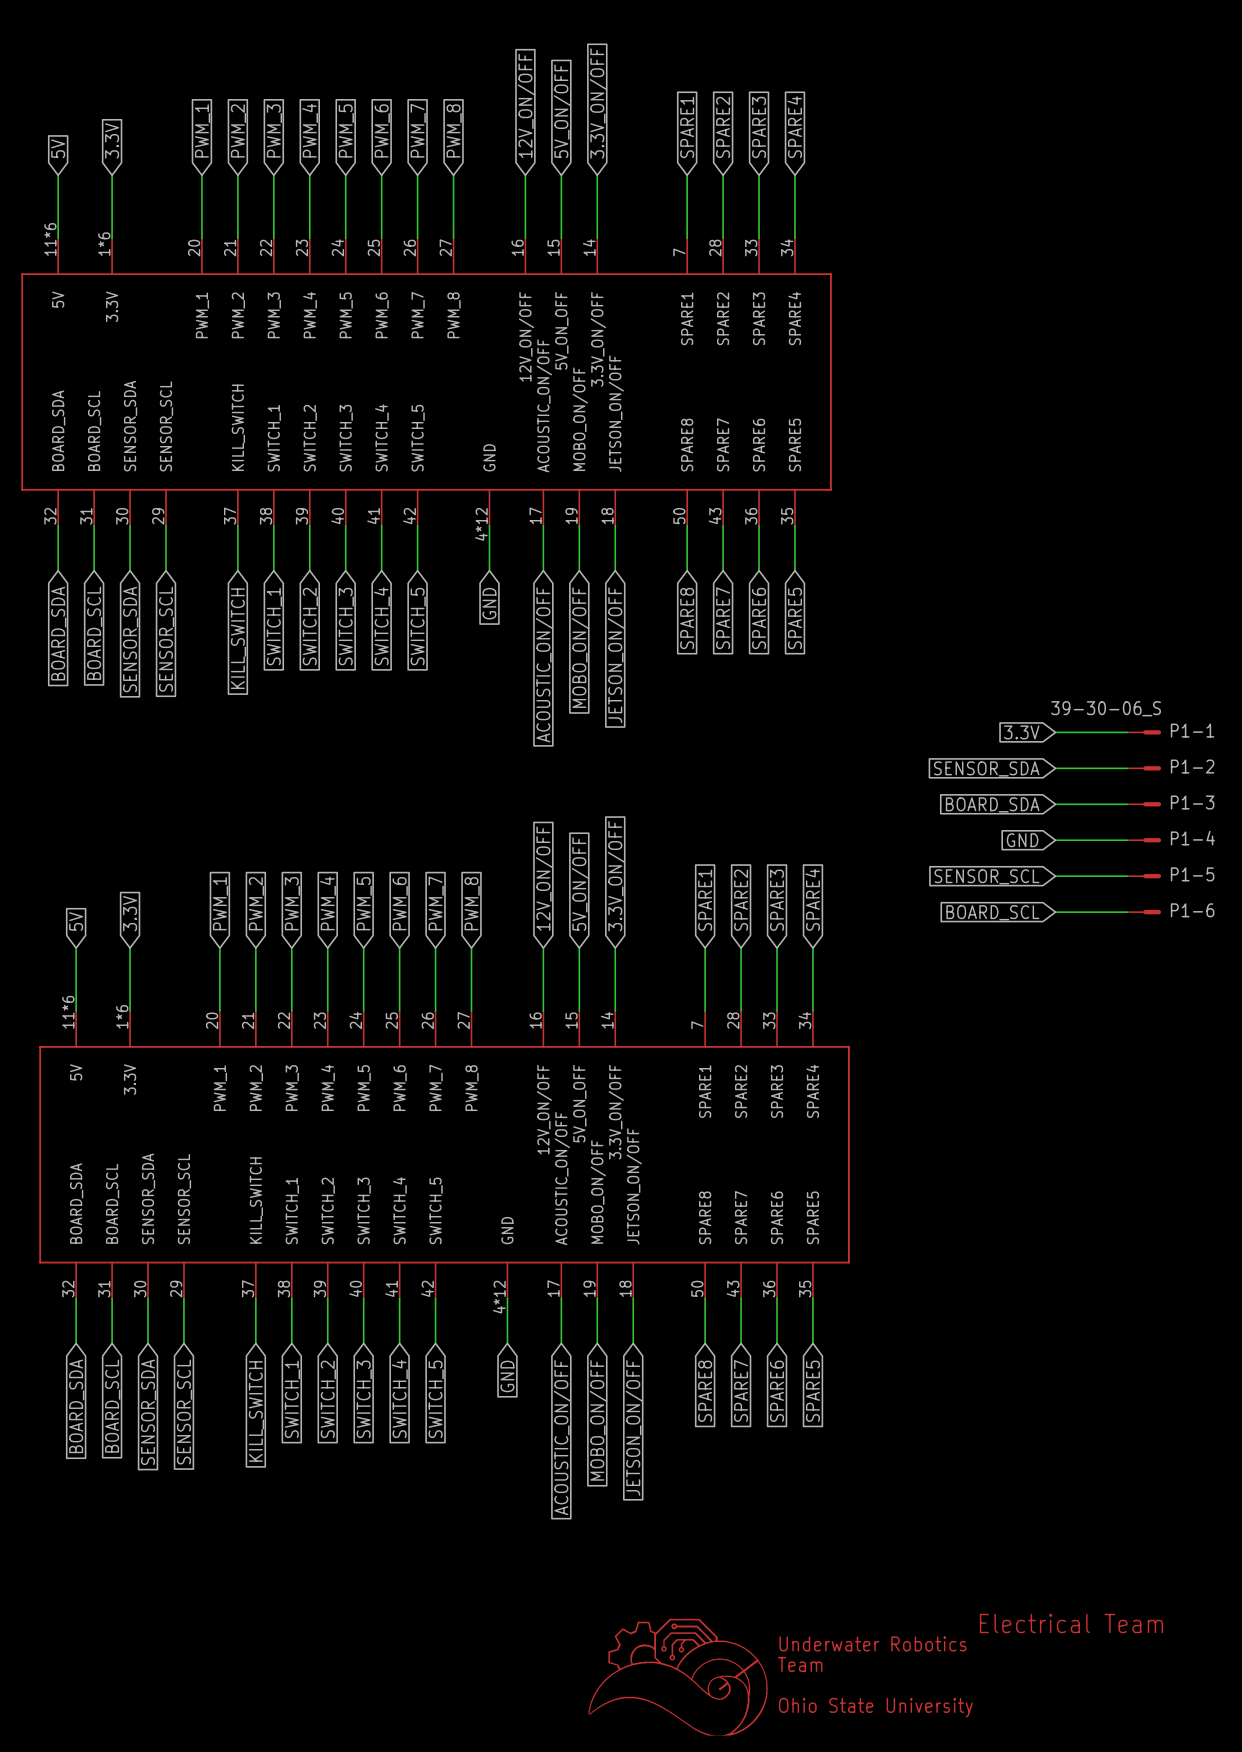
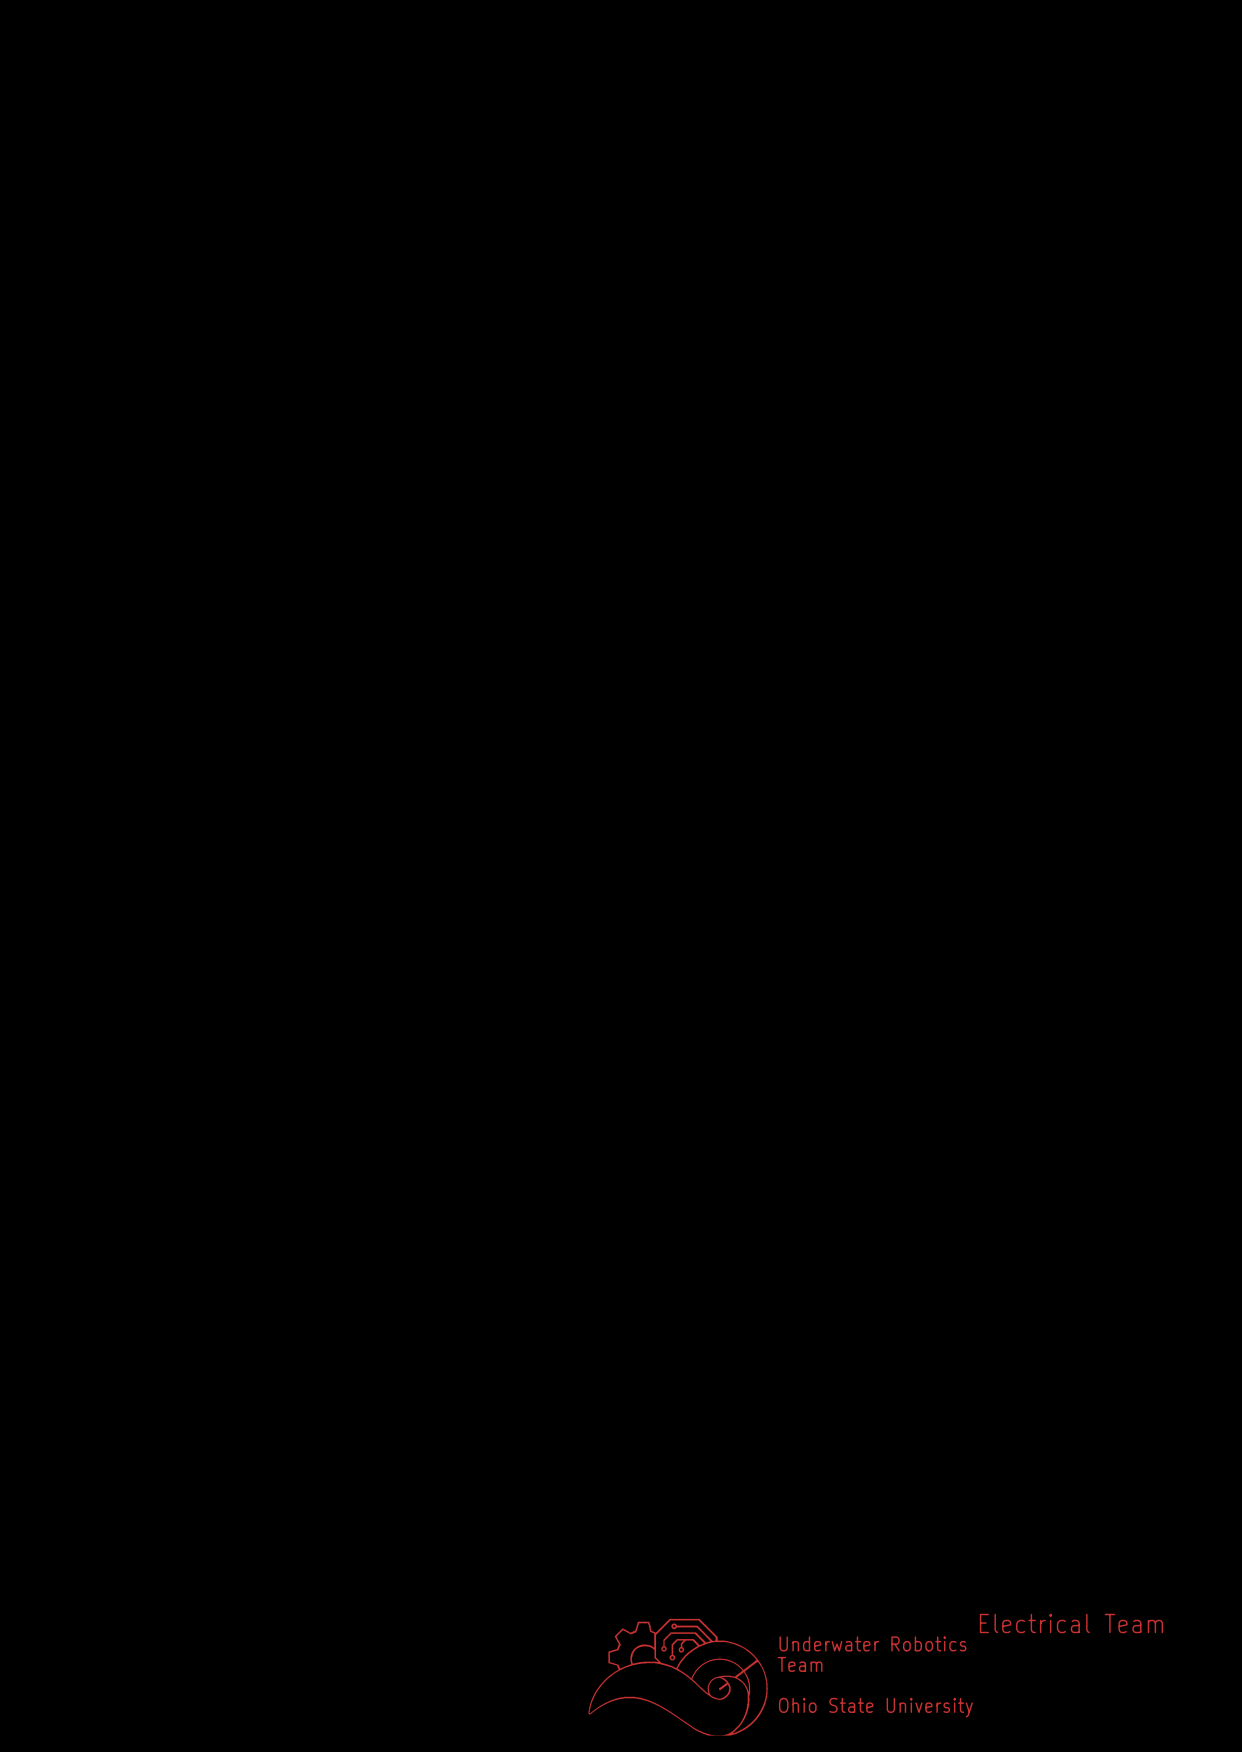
global label: 3.3V_ON/OFF (598, 103) -> none
global label: 12V_ON/OFF (526, 105) -> none
global label: 5V_ON/OFF (562, 111) -> none
global label: SPARE1 (687, 127) -> none
global label: SPARE2 (723, 127) -> none
global label: SPARE3 (759, 127) -> none
global label: SPARE4 (794, 127) -> none
global label: PWM_1 (202, 130) -> none
global label: PWM_2 (238, 130) -> none
global label: PWM_3 (274, 130) -> none
global label: PWM_4 (310, 130) -> none
global label: PWM_5 (346, 130) -> none
global label: PWM_6 (382, 130) -> none
global label: PWM_7 (418, 130) -> none
global label: PWM_8 (454, 130) -> none
global label: 3.3V (112, 140) -> none
global label: 5V (58, 148) -> none
wire: (58, 175) (58, 238) -> none
wire: (112, 175) (112, 238) -> none
wire: (201, 175) (201, 238) -> none
wire: (237, 175) (237, 238) -> none
wire: (273, 175) (273, 238) -> none
wire: (309, 175) (309, 238) -> none
wire: (345, 175) (345, 238) -> none
wire: (381, 175) (381, 238) -> none
wire: (417, 175) (417, 238) -> none
wire: (453, 175) (453, 238) -> none
wire: (525, 175) (525, 238) -> none
wire: (561, 175) (561, 238) -> none
wire: (597, 175) (597, 238) -> none
wire: (687, 175) (687, 238) -> none
wire: (723, 175) (723, 238) -> none
wire: (759, 175) (759, 238) -> none
wire: (794, 175) (794, 238) -> none
part: (426, 381) -> none
wire: (58, 525) (58, 570) -> none
wire: (94, 525) (94, 570) -> none
wire: (130, 525) (130, 570) -> none
wire: (165, 525) (165, 570) -> none
wire: (237, 525) (237, 570) -> none
wire: (273, 525) (273, 570) -> none
wire: (309, 525) (309, 570) -> none
wire: (345, 525) (345, 570) -> none
wire: (381, 525) (381, 570) -> none
wire: (417, 525) (417, 570) -> none
wire: (489, 525) (489, 570) -> none
wire: (543, 525) (543, 570) -> none
wire: (579, 525) (579, 570) -> none
wire: (615, 525) (615, 570) -> none
wire: (687, 525) (687, 570) -> none
wire: (723, 525) (723, 570) -> none
wire: (759, 525) (759, 570) -> none
wire: (794, 525) (794, 570) -> none
global label: GND (489, 603) -> none
global label: SPARE8 (687, 618) -> none
global label: SPARE7 (723, 618) -> none
global label: SPARE6 (759, 618) -> none
global label: SPARE5 (794, 618) -> none
global label: SWITCH_1 (274, 626) -> none
global label: SWITCH_2 (310, 626) -> none
global label: SWITCH_3 (346, 626) -> none
global label: SWITCH_4 (381, 626) -> none
global label: SWITCH_5 (418, 626) -> none
global label: BOARD_SDA (58, 633) -> none
global label: BOARD_SCL (94, 633) -> none
global label: KILL_SWITCH (238, 638) -> none
global label: SENSOR_SDA (130, 639) -> none
global label: SENSOR_SCL (166, 639) -> none
global label: MOBO_ON/OFF (580, 647) -> none
global label: JETSON_ON/OFF (616, 655) -> none
global label: ACOUSTIC_ON/OFF (544, 664) -> none
global label: 3.3V (1021, 732) -> none
wire: (1055, 732) (1127, 732) -> none
P1-1: 39-30-06_S (1144, 732) -> none
global label: SENSOR_SDA (986, 768) -> none
wire: (1055, 768) (1127, 768) -> none
P1-2: (1144, 768) -> none
global label: BOARD_SDA (992, 804) -> none
wire: (1055, 804) (1127, 804) -> none
P1-3: (1144, 804) -> none
global label: GND (1022, 840) -> none
wire: (1055, 840) (1127, 840) -> none
P1-4: (1144, 840) -> none
global label: 3.3V_ON/OFF (616, 876) -> none
global label: SENSOR_SCL (986, 876) -> none
wire: (1055, 876) (1127, 876) -> none
P1-5: (1144, 876) -> none
global label: 12V_ON/OFF (544, 878) -> none
global label: 5V_ON/OFF (580, 884) -> none
global label: SPARE4 (812, 899) -> none
global label: SPARE1 (705, 900) -> none
global label: SPARE2 (741, 900) -> none
global label: SPARE3 (777, 900) -> none
global label: PWM_1 (220, 903) -> none
global label: PWM_2 (256, 903) -> none
global label: PWM_3 (292, 903) -> none
global label: PWM_4 (328, 903) -> none
global label: PWM_5 (364, 903) -> none
global label: PWM_6 (400, 903) -> none
global label: PWM_7 (436, 903) -> none
global label: PWM_8 (472, 903) -> none
global label: BOARD_SCL (992, 912) -> none
wire: (1055, 912) (1127, 912) -> none
P1-6: (1144, 912) -> none
global label: 3.3V (130, 913) -> none
global label: 5V (76, 921) -> none
wire: (76, 948) (76, 1010) -> none
wire: (130, 948) (130, 1010) -> none
wire: (219, 948) (219, 1010) -> none
wire: (255, 948) (255, 1010) -> none
wire: (291, 948) (291, 1010) -> none
wire: (327, 948) (327, 1010) -> none
wire: (363, 948) (363, 1010) -> none
wire: (399, 948) (399, 1010) -> none
wire: (435, 948) (435, 1010) -> none
wire: (471, 948) (471, 1010) -> none
wire: (543, 948) (543, 1010) -> none
wire: (579, 948) (579, 1010) -> none
wire: (615, 948) (615, 1010) -> none
wire: (705, 948) (705, 1010) -> none
wire: (741, 948) (741, 1010) -> none
wire: (777, 948) (777, 1010) -> none
wire: (812, 948) (812, 1010) -> none
part: (444, 1154) -> none
wire: (76, 1298) (76, 1343) -> none
wire: (112, 1298) (112, 1343) -> none
wire: (148, 1298) (148, 1343) -> none
wire: (183, 1298) (183, 1343) -> none
wire: (255, 1298) (255, 1343) -> none
wire: (291, 1298) (291, 1343) -> none
wire: (327, 1298) (327, 1343) -> none
wire: (363, 1298) (363, 1343) -> none
wire: (399, 1298) (399, 1343) -> none
wire: (435, 1298) (435, 1343) -> none
wire: (507, 1298) (507, 1343) -> none
wire: (561, 1298) (561, 1343) -> none
wire: (597, 1298) (597, 1343) -> none
wire: (633, 1298) (633, 1343) -> none
wire: (705, 1298) (705, 1343) -> none
wire: (741, 1298) (741, 1343) -> none
wire: (777, 1298) (777, 1343) -> none
wire: (812, 1298) (812, 1343) -> none
global label: GND (507, 1376) -> none
global label: SPARE8 (705, 1391) -> none
global label: SPARE7 (741, 1391) -> none
global label: SPARE6 (777, 1391) -> none
global label: SPARE5 (812, 1391) -> none
global label: SWITCH_1 (292, 1399) -> none
global label: SWITCH_2 (328, 1399) -> none
global label: SWITCH_3 (364, 1399) -> none
global label: SWITCH_4 (399, 1399) -> none
global label: SWITCH_5 (436, 1399) -> none
global label: BOARD_SDA (76, 1406) -> none
global label: BOARD_SCL (112, 1406) -> none
global label: KILL_SWITCH (256, 1411) -> none
global label: SENSOR_SDA (148, 1412) -> none
global label: SENSOR_SCL (184, 1412) -> none
global label: MOBO_ON/OFF (598, 1420) -> none
global label: JETSON_ON/OFF (634, 1427) -> none
global label: ACOUSTIC_ON/OFF (562, 1437) -> none

